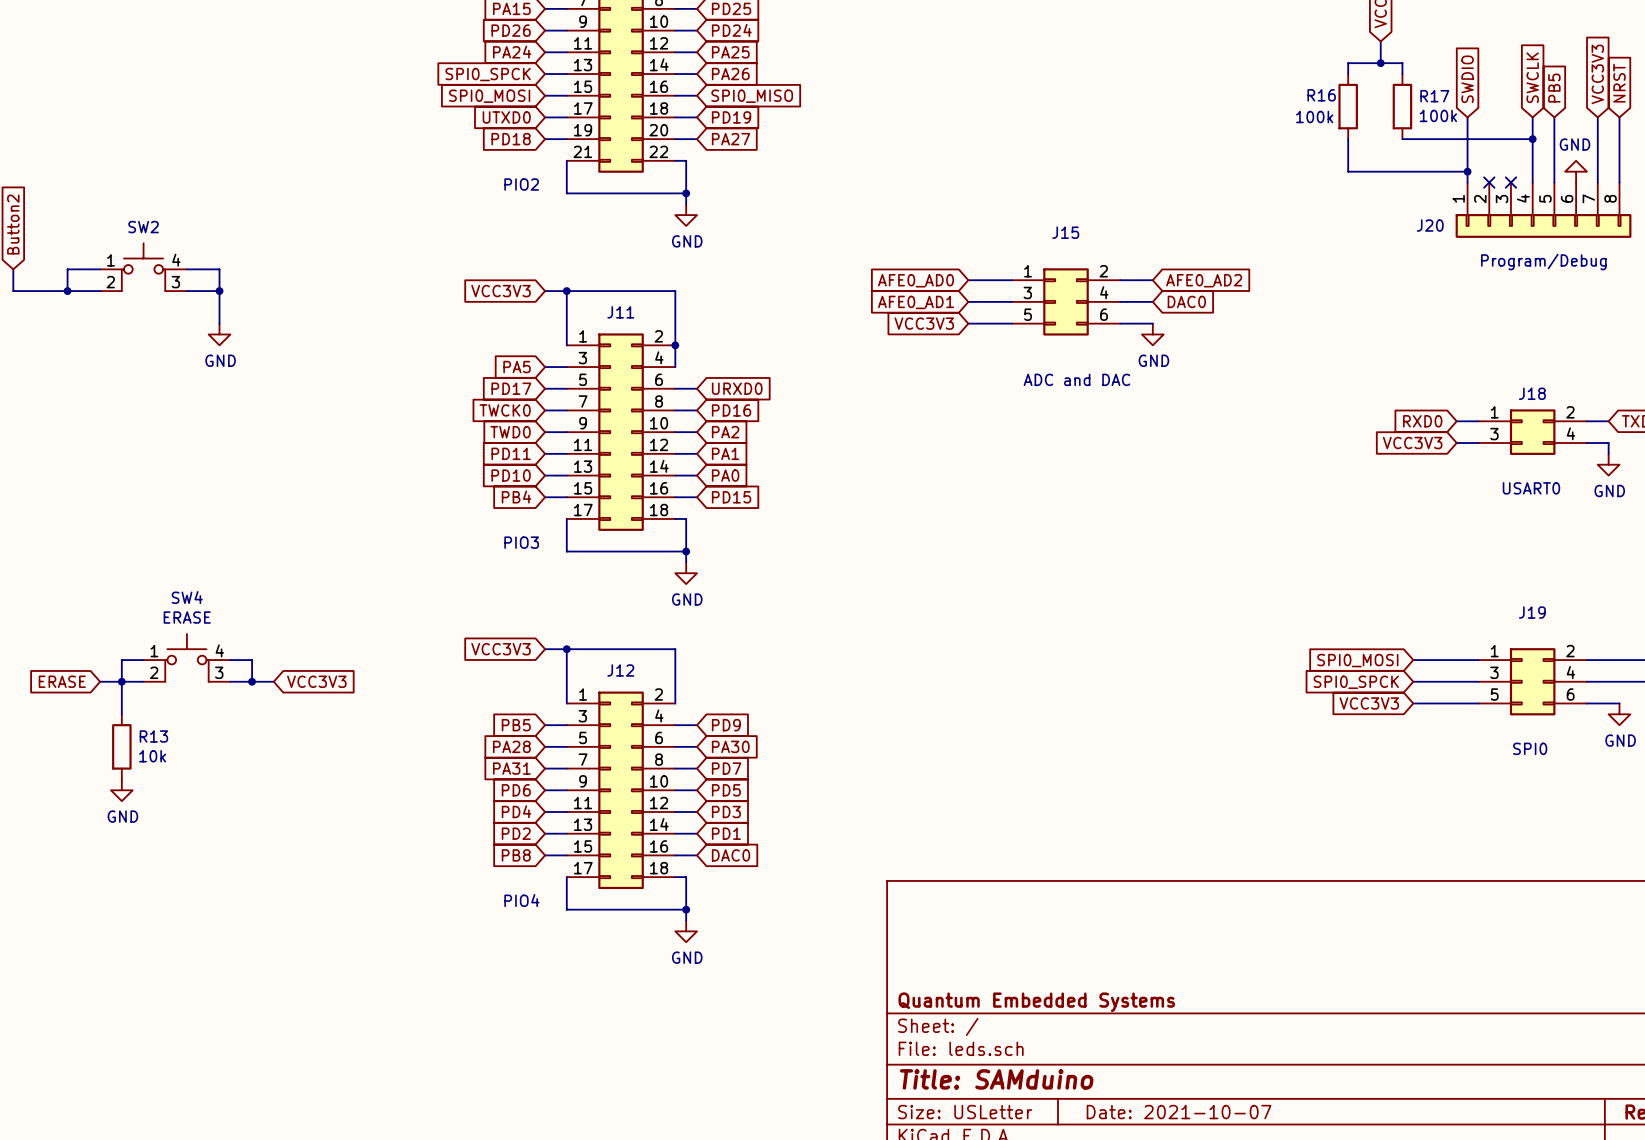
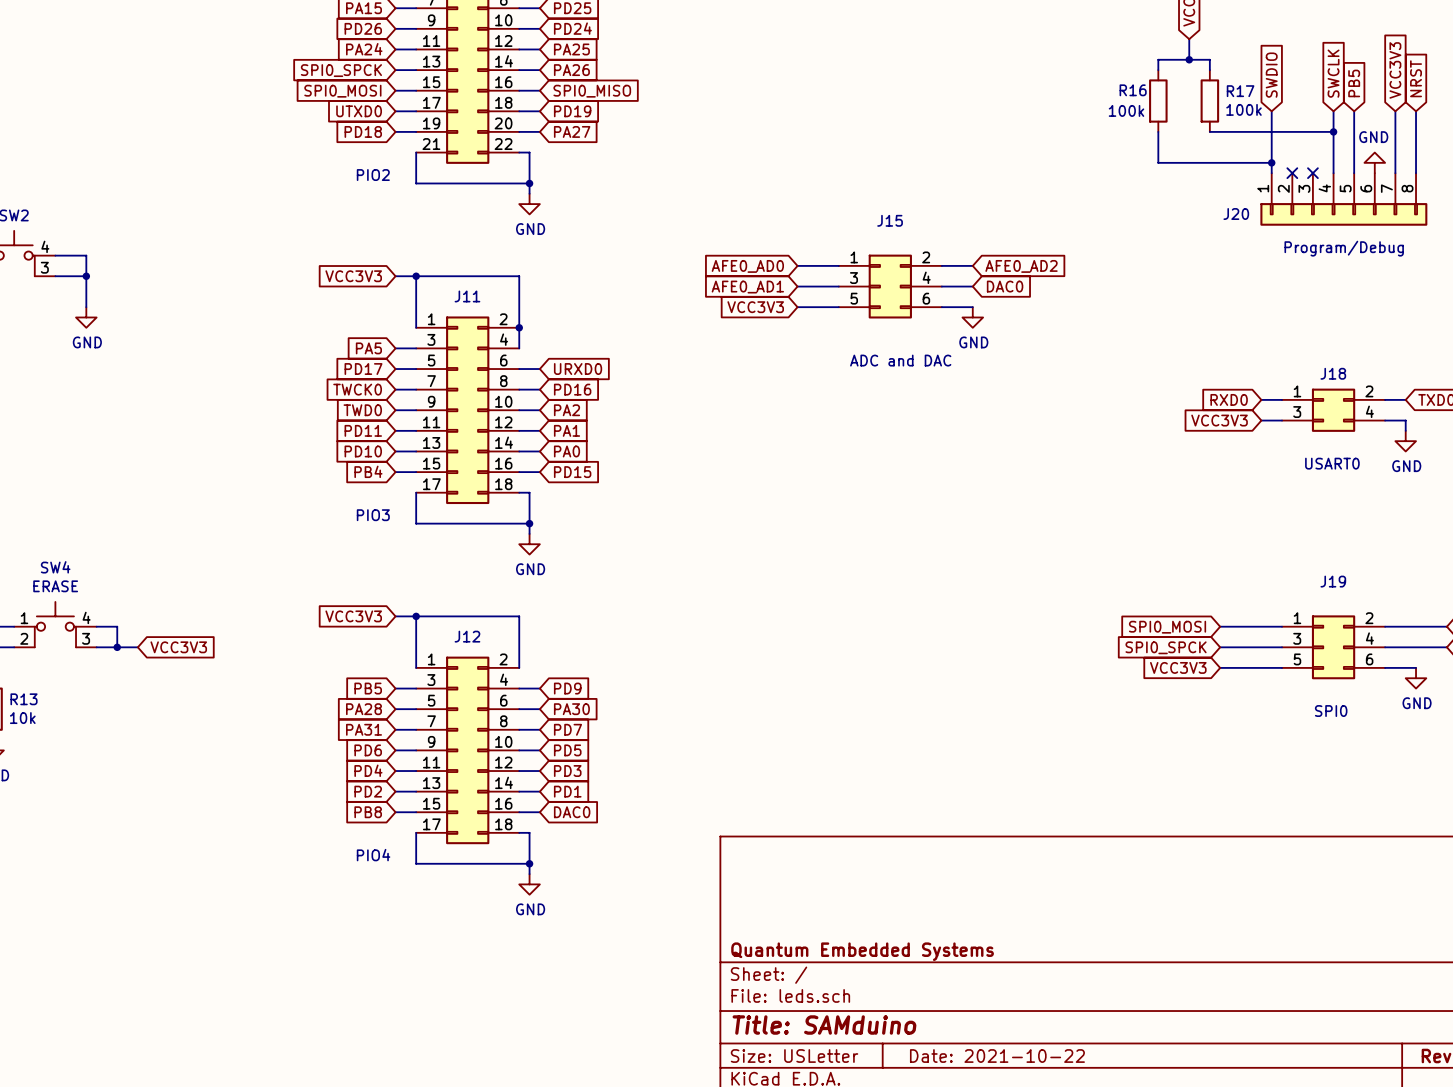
title block: Date: 2021-10-07 (1179, 1112) -> Date: 2021-10-22 (997, 1056)

